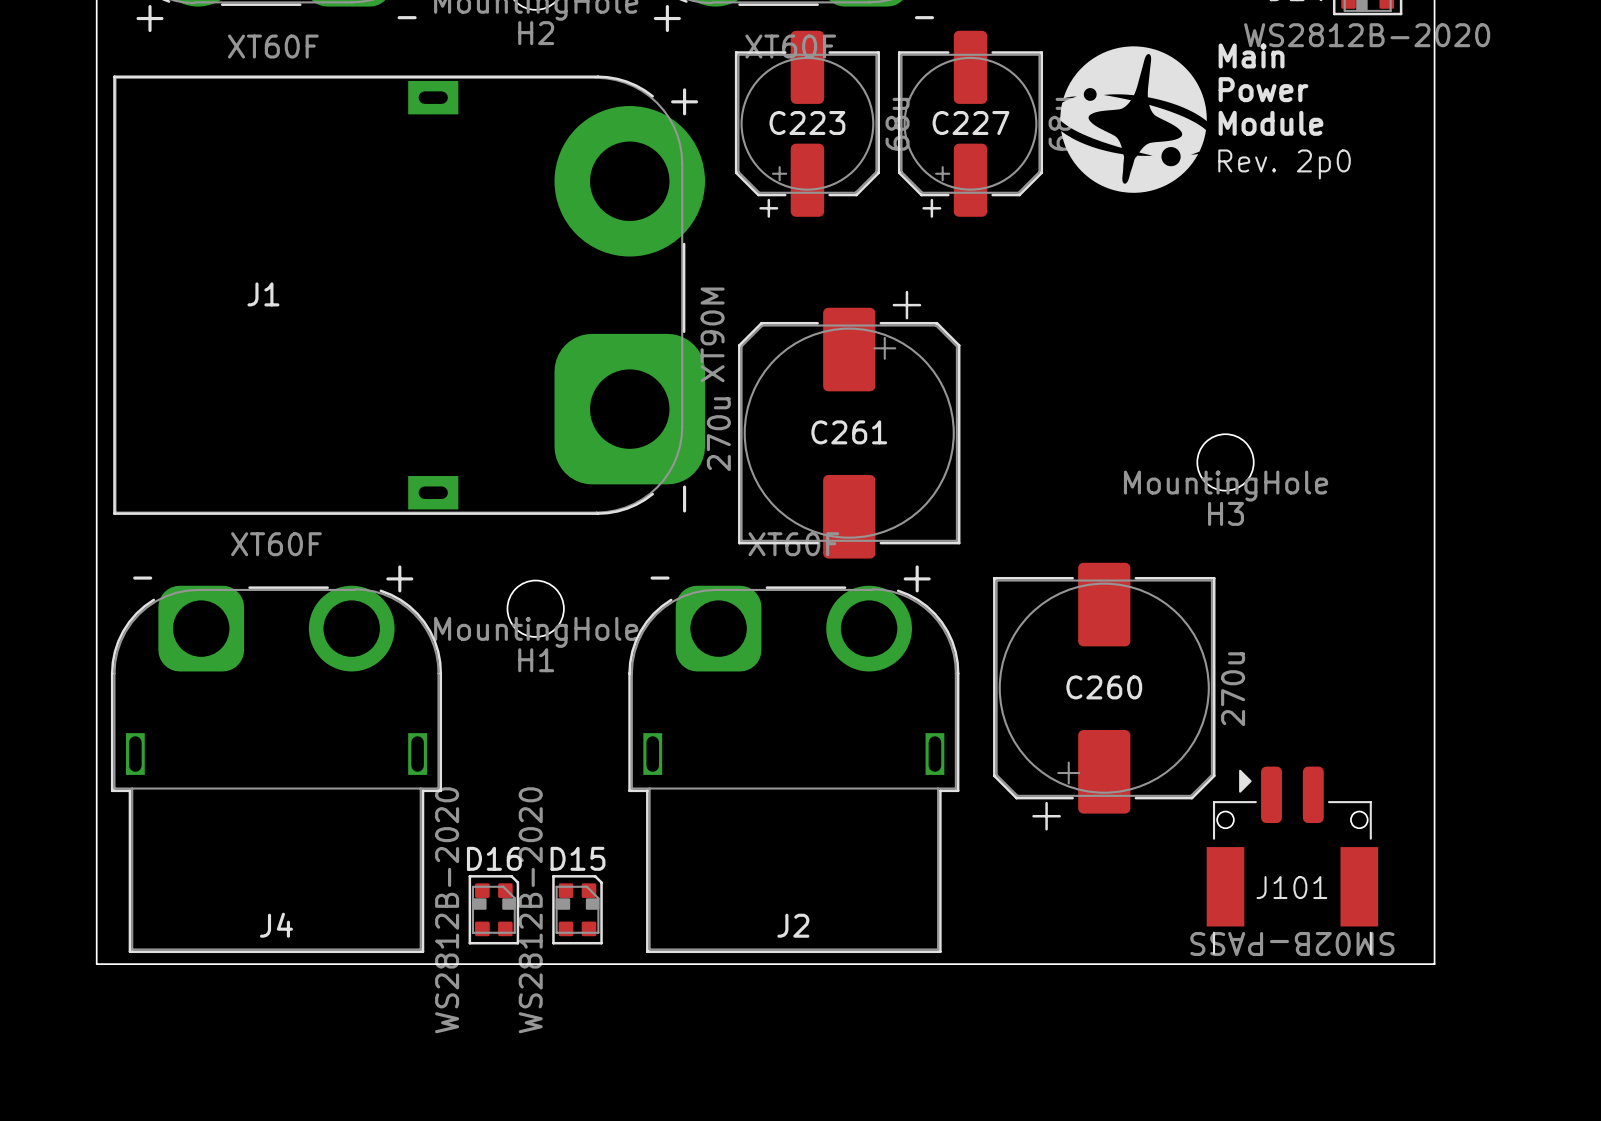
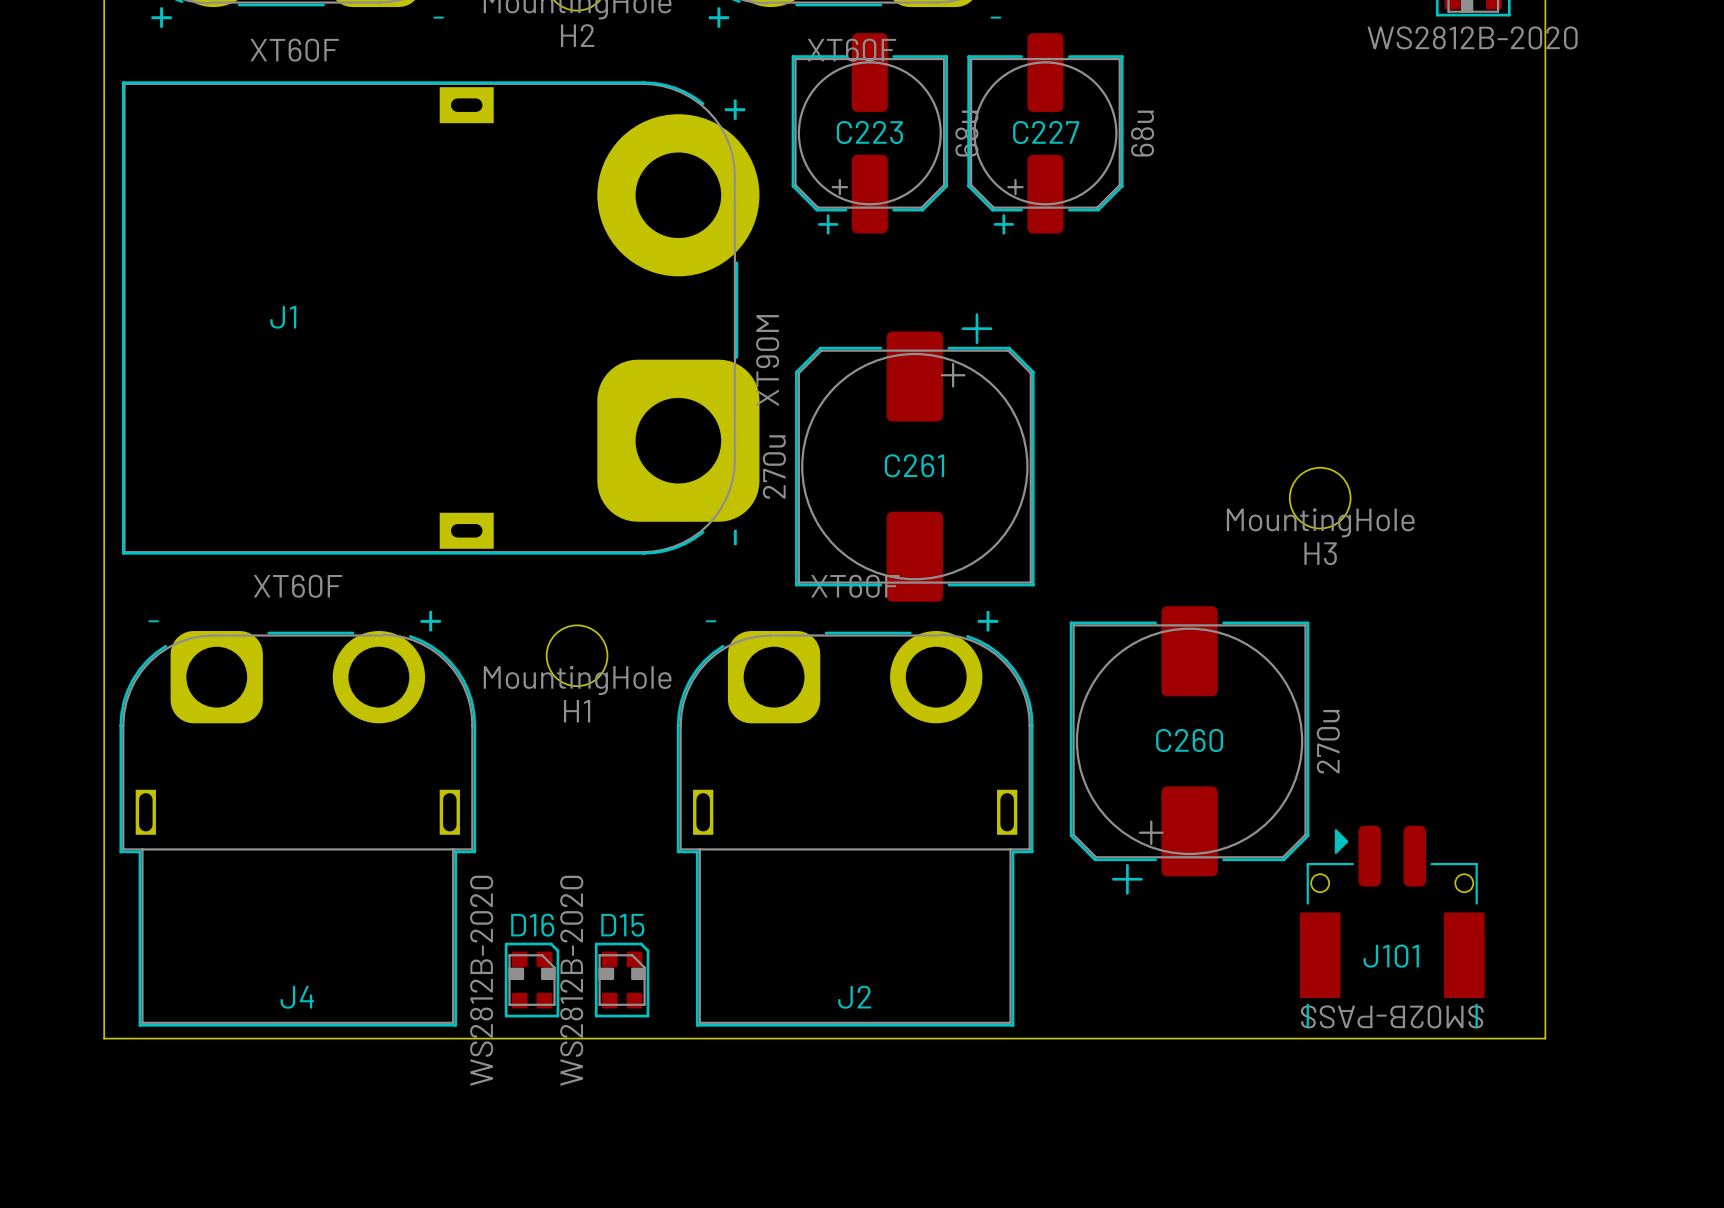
drawing: [1060, 46, 1207, 193] -> none
text: Main (1251, 56) -> none
text: Power (1263, 89) -> none
text: Module (1270, 123) -> none
text: Rev. 2p0 (1284, 164) -> none

